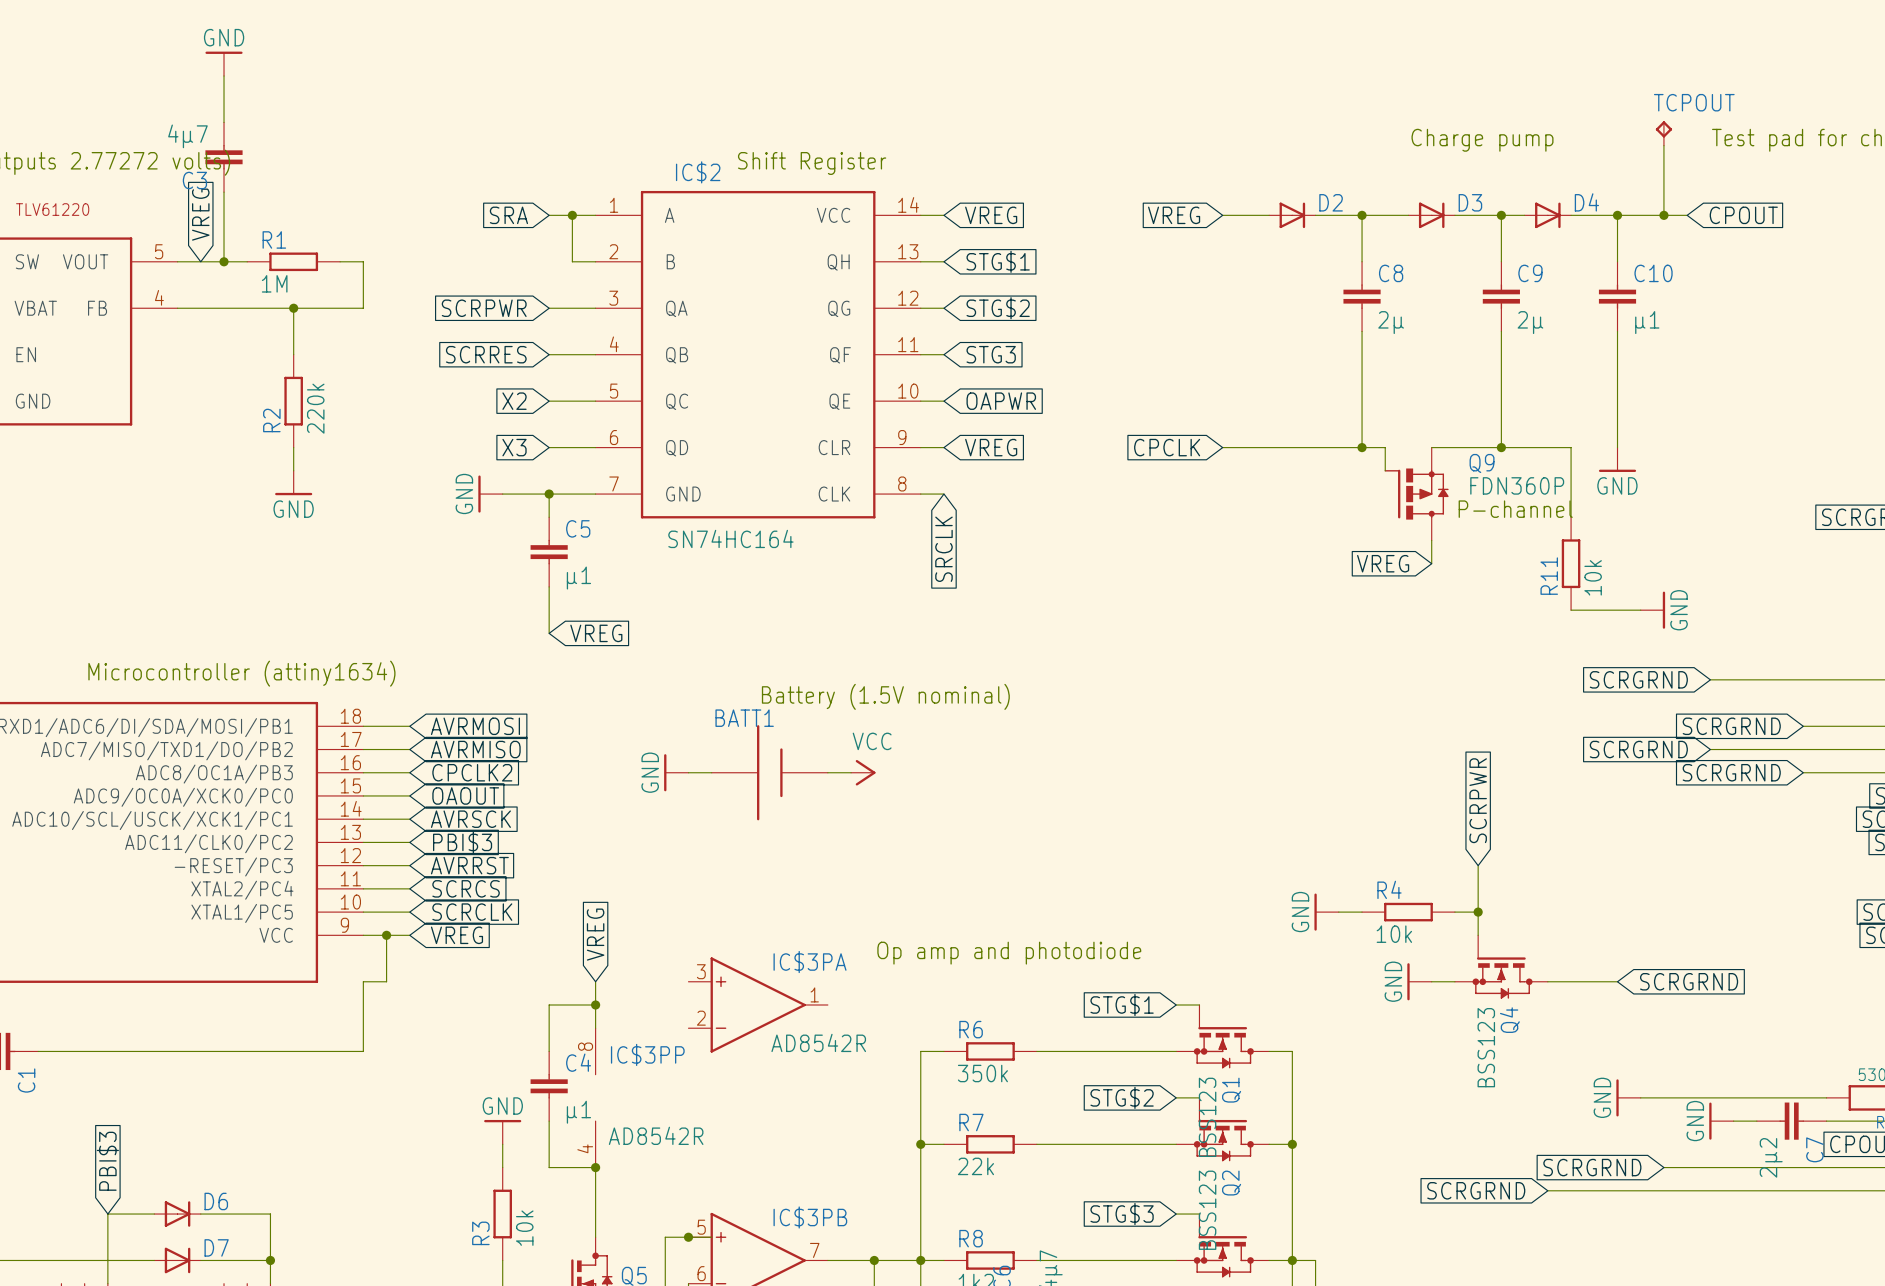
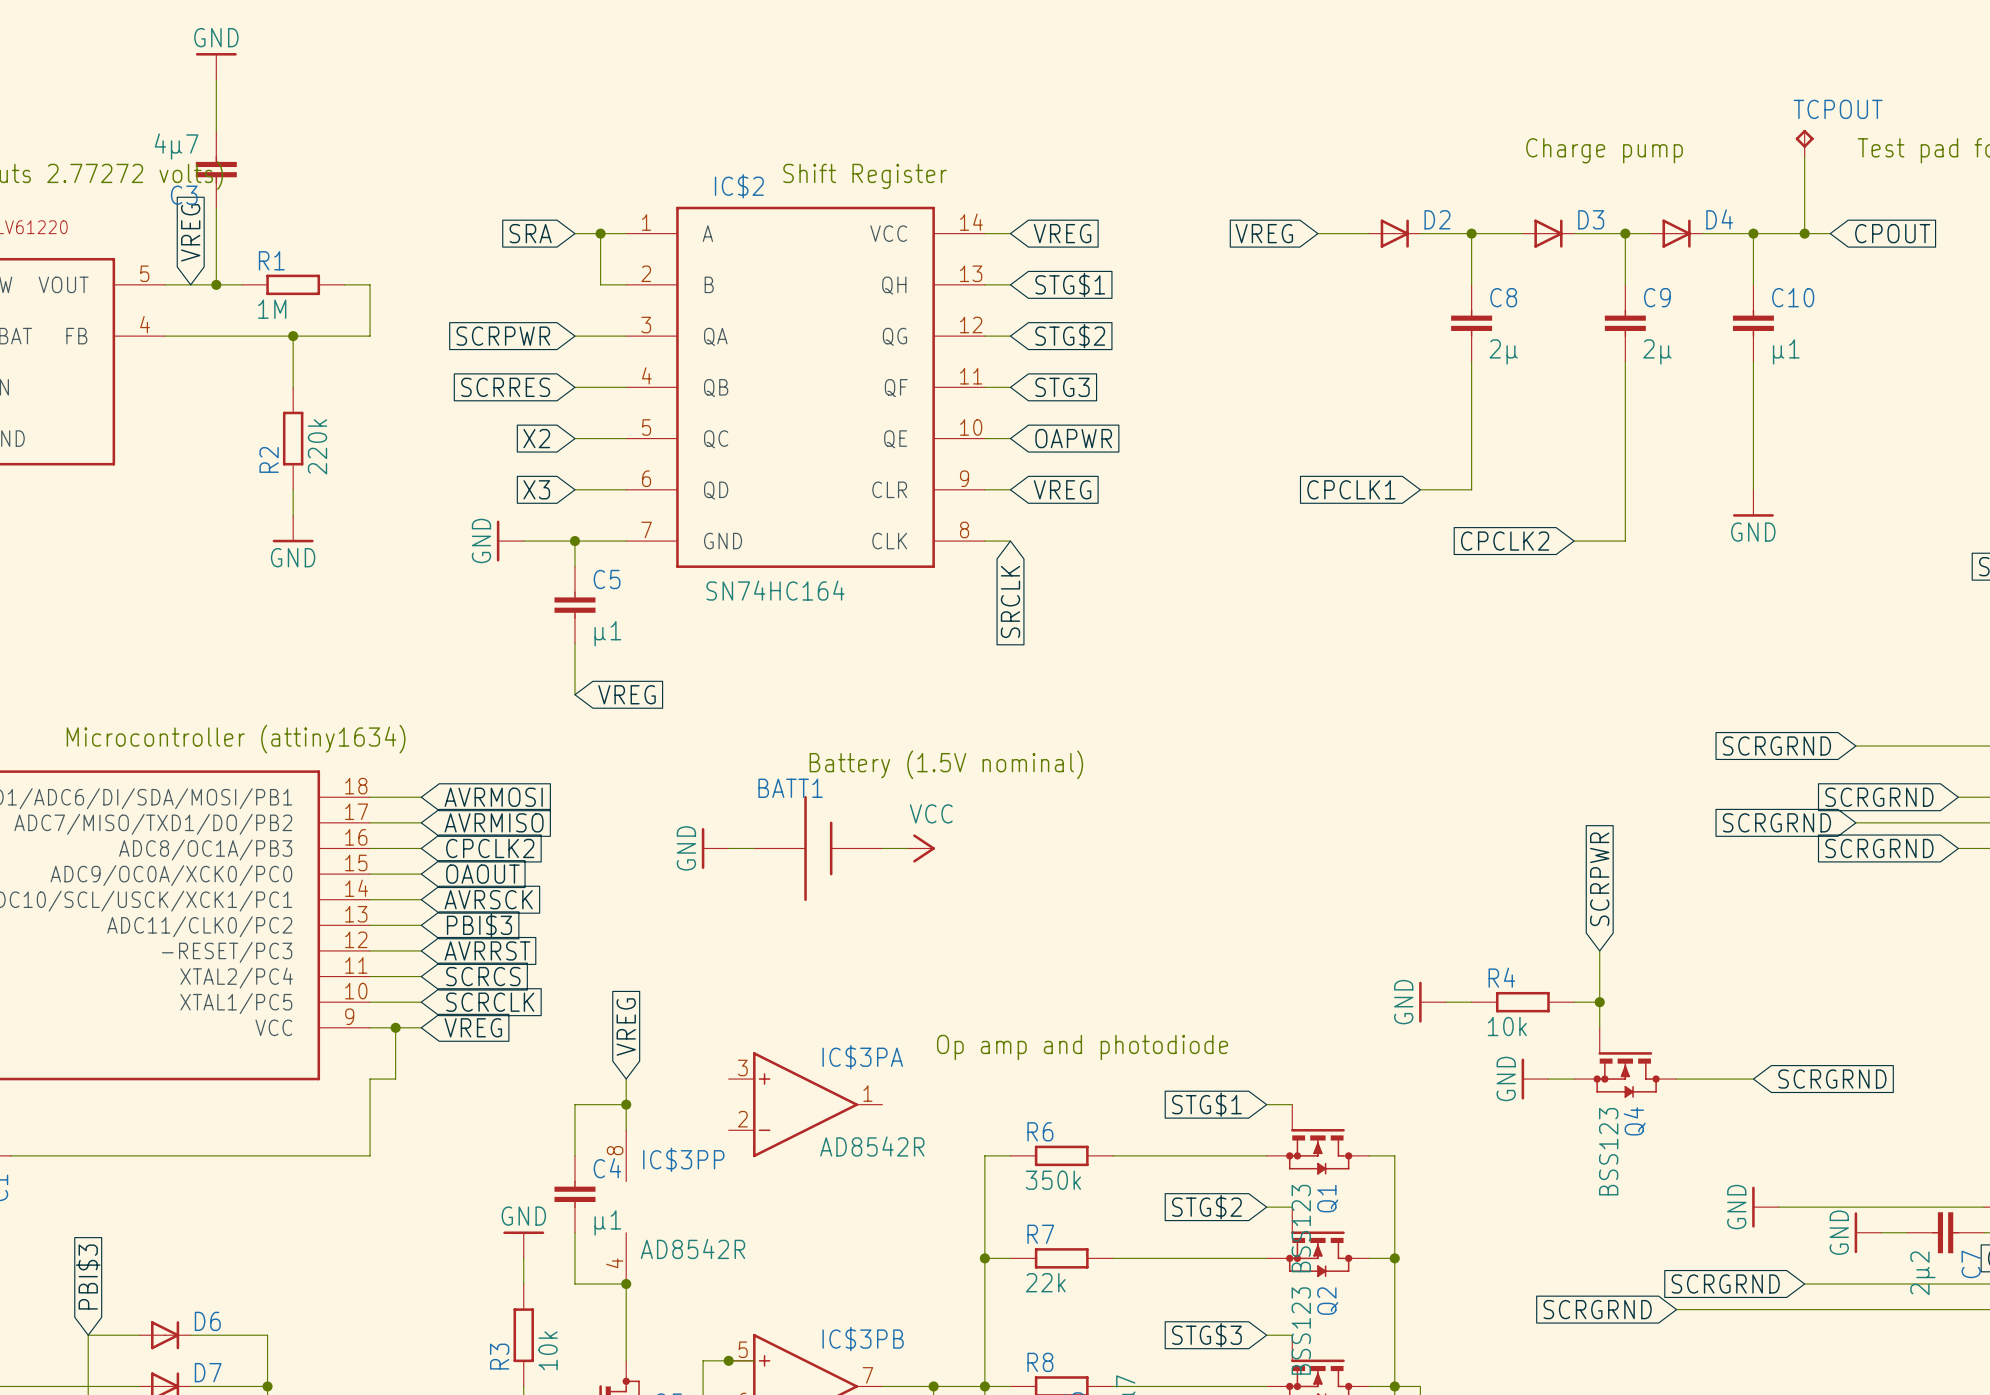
global label: CPCLK (1167, 447) -> CPCLK1 (1351, 489)
wire: (1222, 447) (1315, 447) -> none
wire: (1362, 447) (1385, 447) (1385, 470) -> none
junction: (1362, 447) -> none
wire: (1431, 447) (1571, 447) (1571, 517) -> none
wire: none -> (1625, 489) (1625, 541) (1574, 541)
junction: (1501, 447) -> none
global label: none -> CPCLK2 (1505, 541)
Q9: FDN360P (1416, 494) -> none
text: P-channel (1515, 509) -> none
wire: (1431, 540) (1431, 563) -> none
global label: VREG (1383, 563) -> none
R11: 10k (1571, 563) -> none
wire: (1571, 610) (1640, 610) -> none
power symbol: GND (1652, 610) -> none

